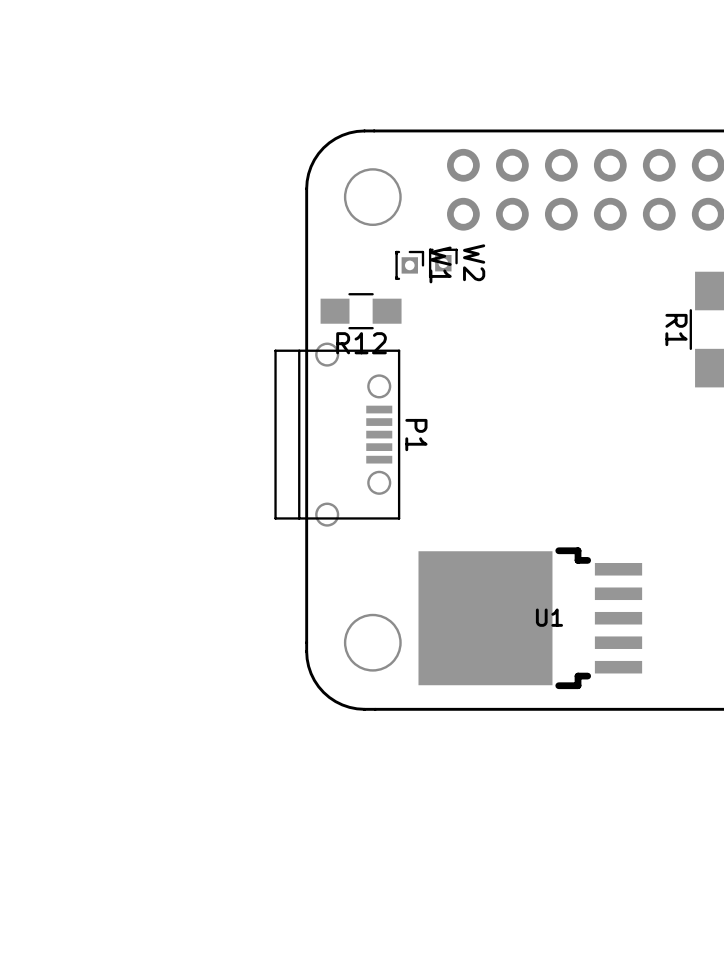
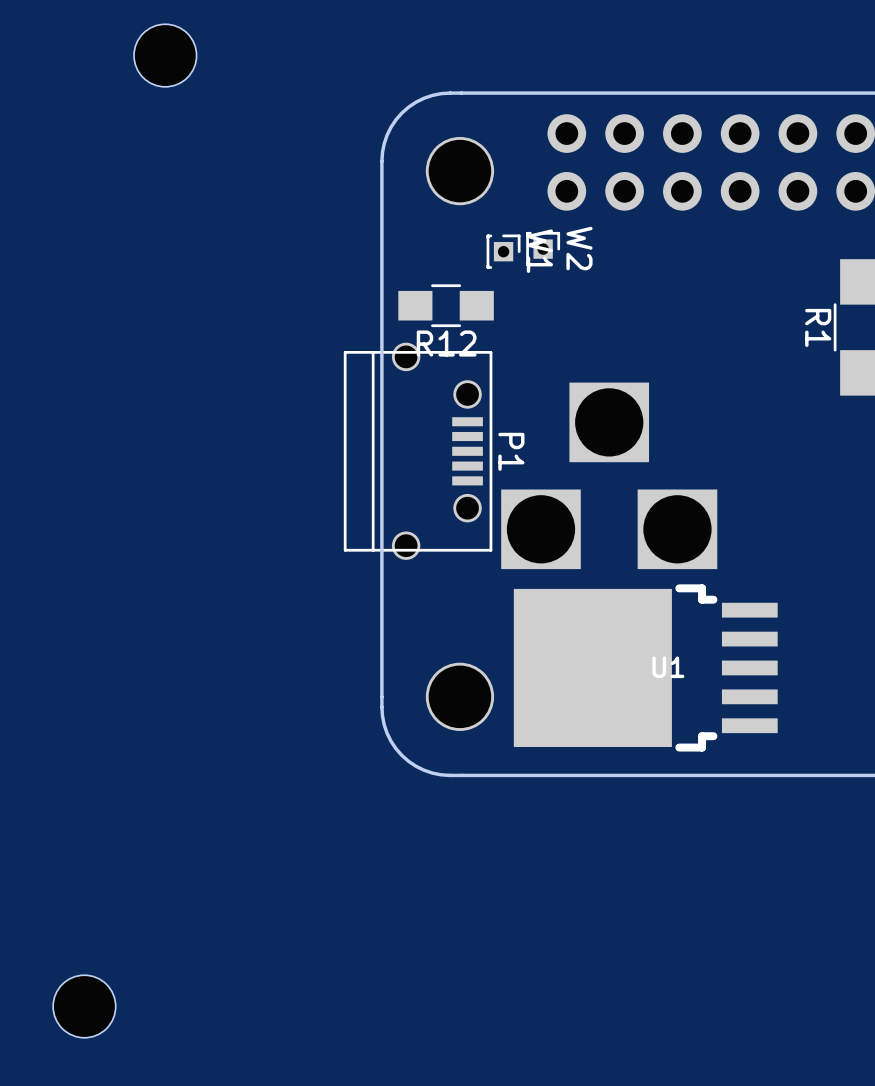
part: none -> (165, 55)
part: none -> (609, 475)
part: none -> (84, 1006)

